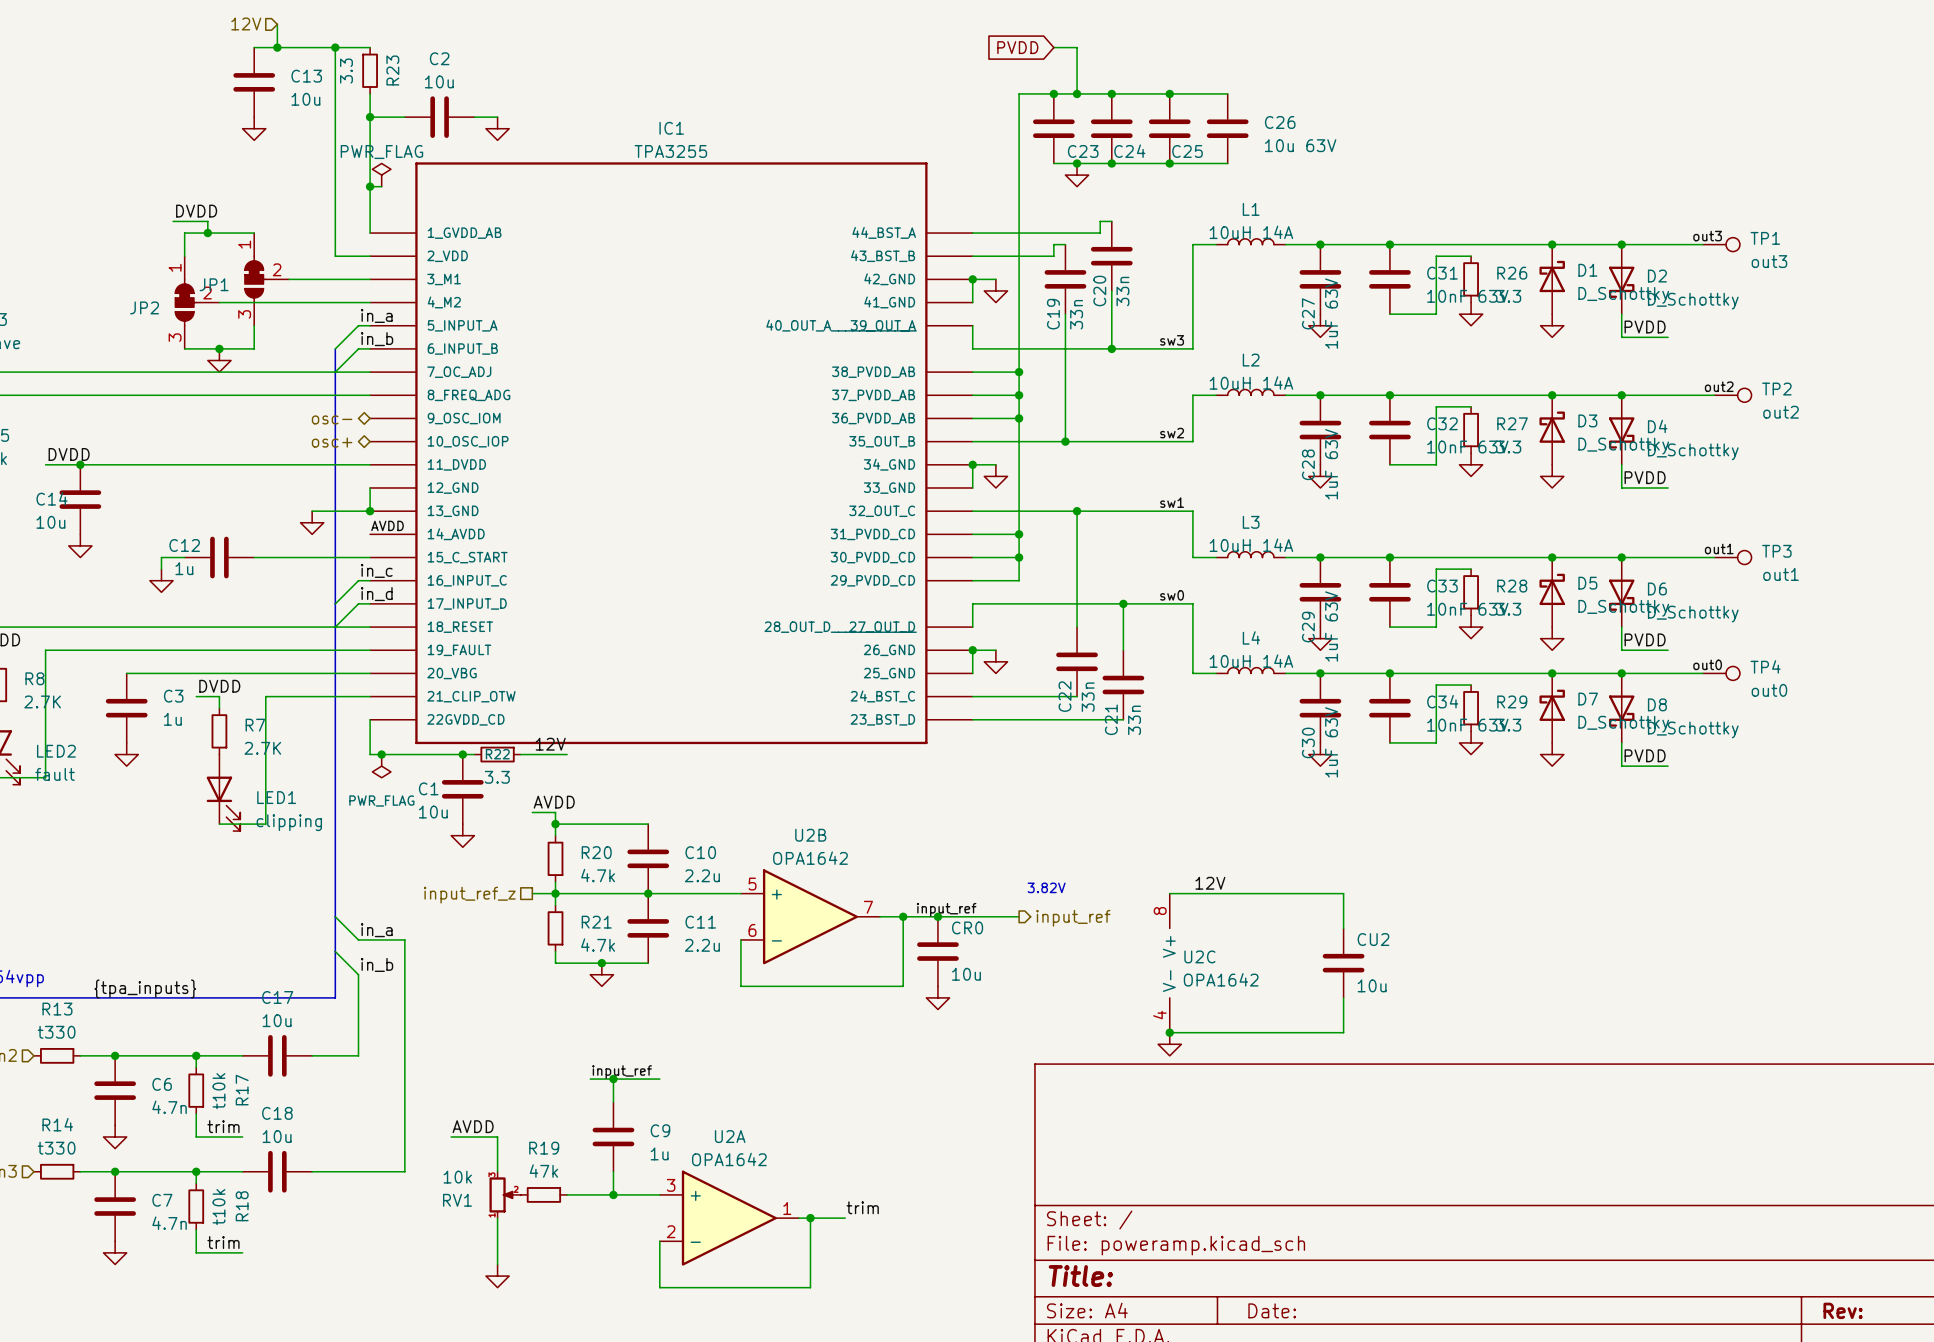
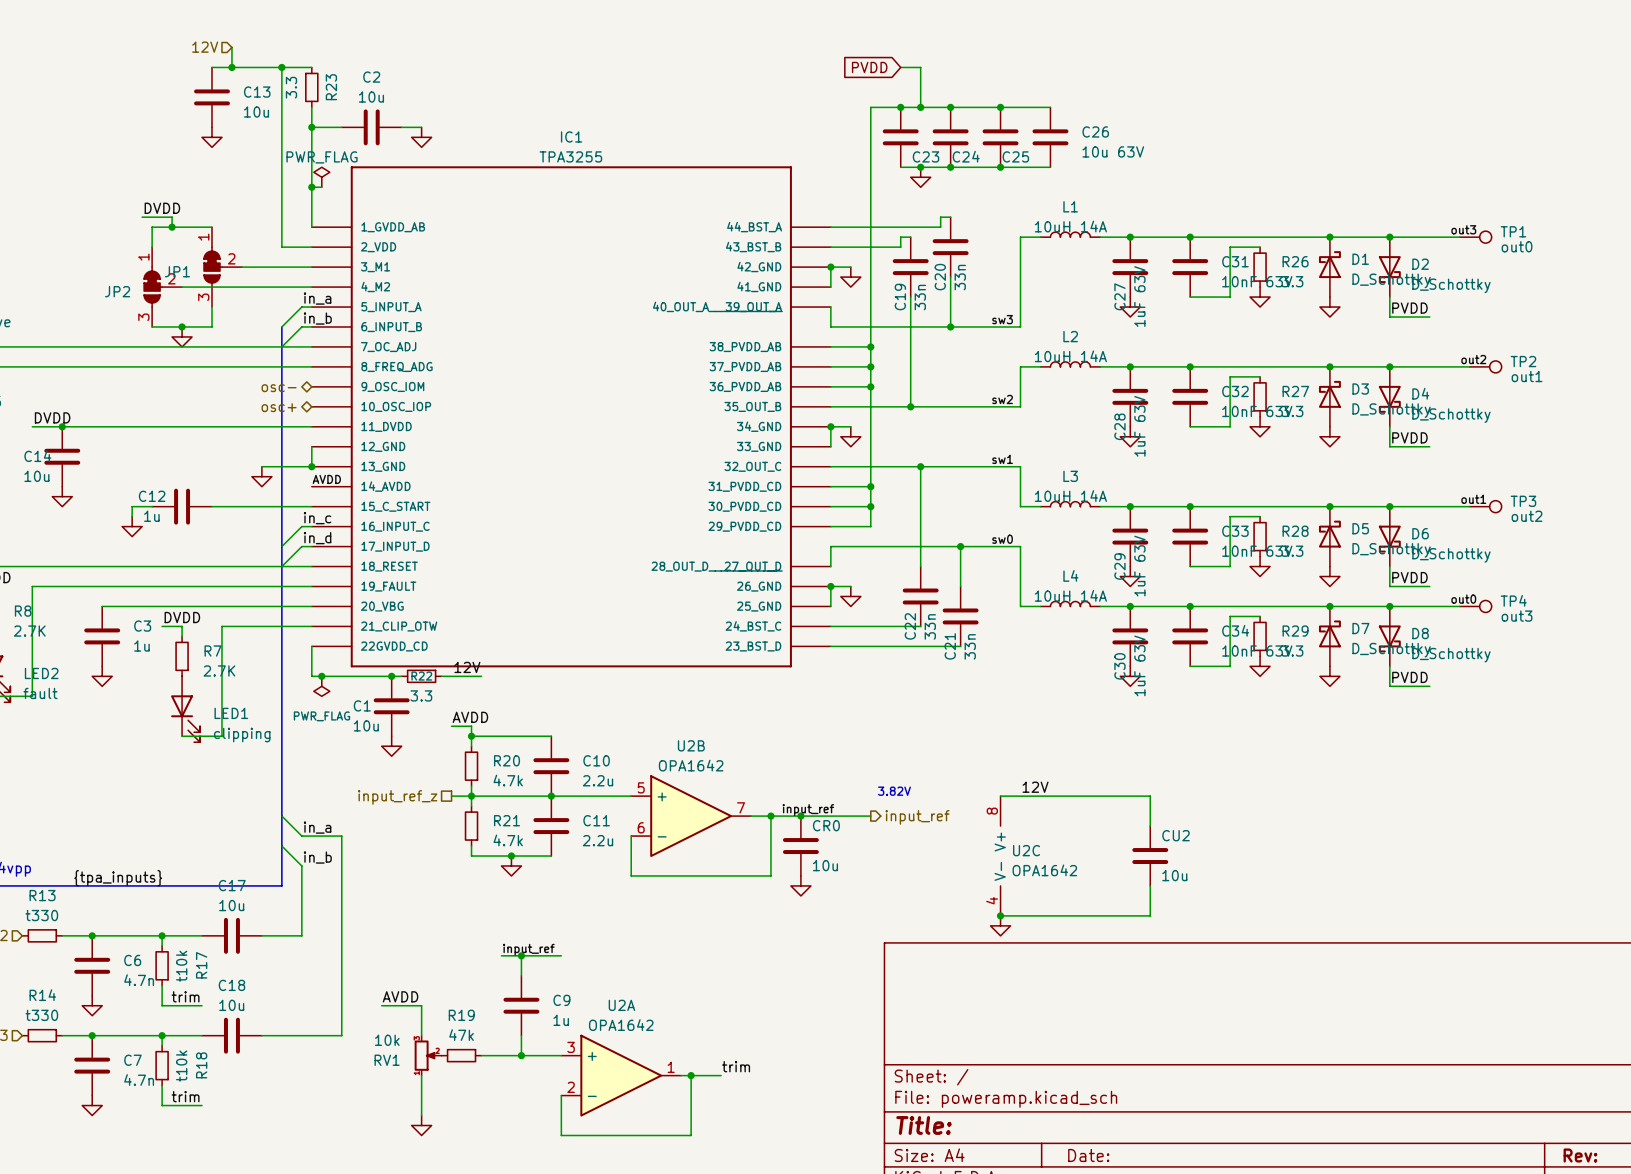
TP1 value: out3 (1769, 261) -> out0 (1517, 246)
TP2 value: out2 (1781, 412) -> out1 (1527, 376)
TP3 value: out1 (1781, 574) -> out2 (1527, 516)
TP4 value: out0 (1769, 690) -> out3 (1517, 616)

